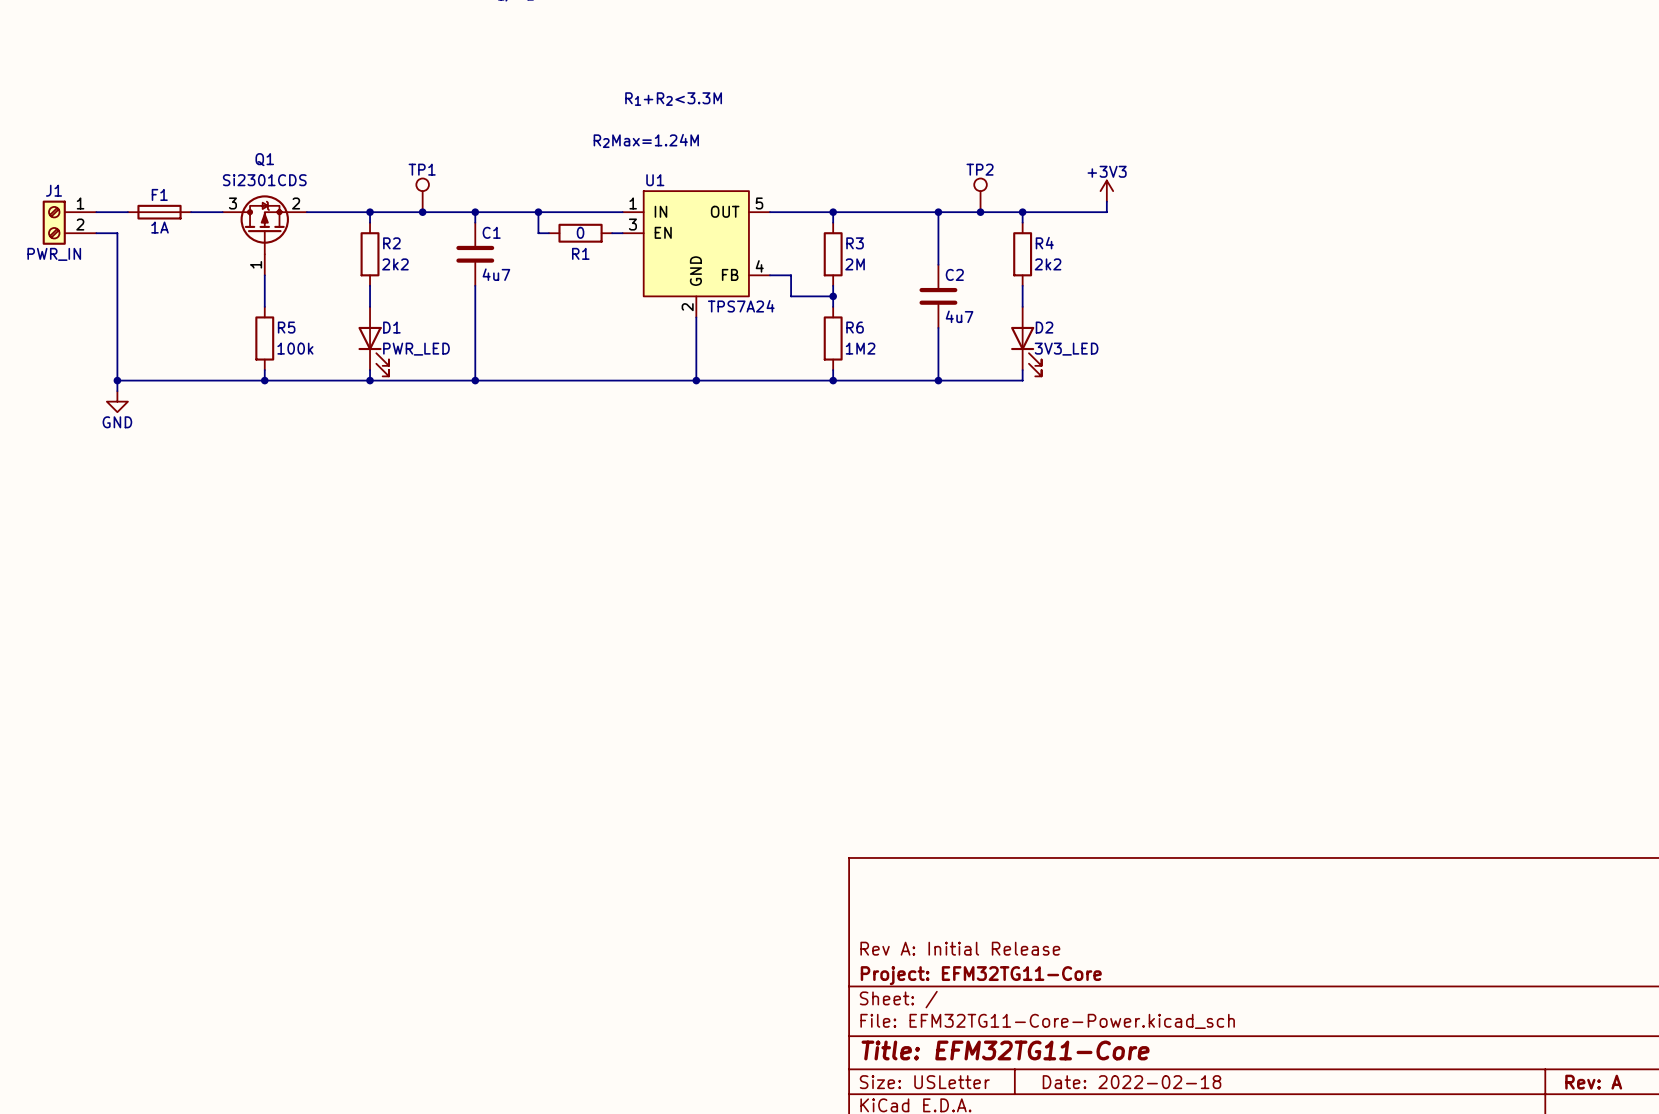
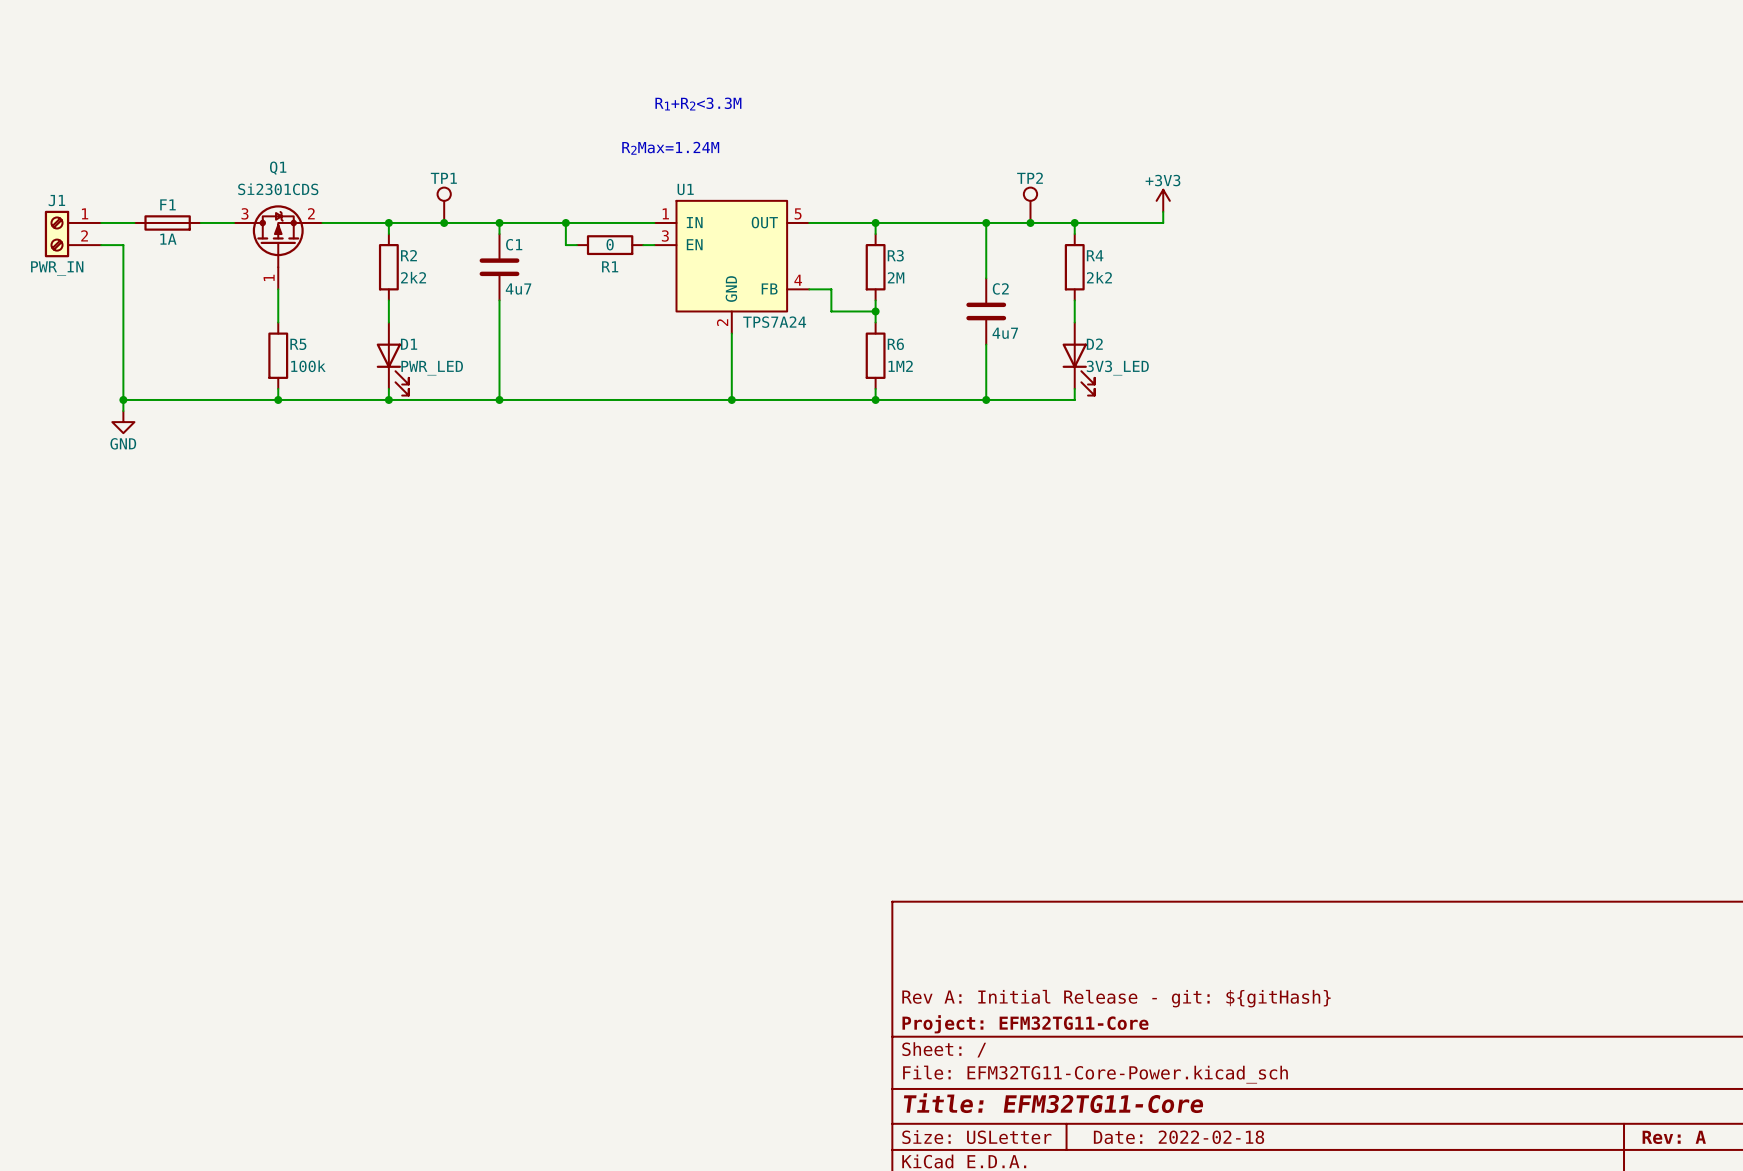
title block: Rev A: Initial Release (960, 948) -> Rev A: Initial Release - git: ${gitHash} (1116, 998)

